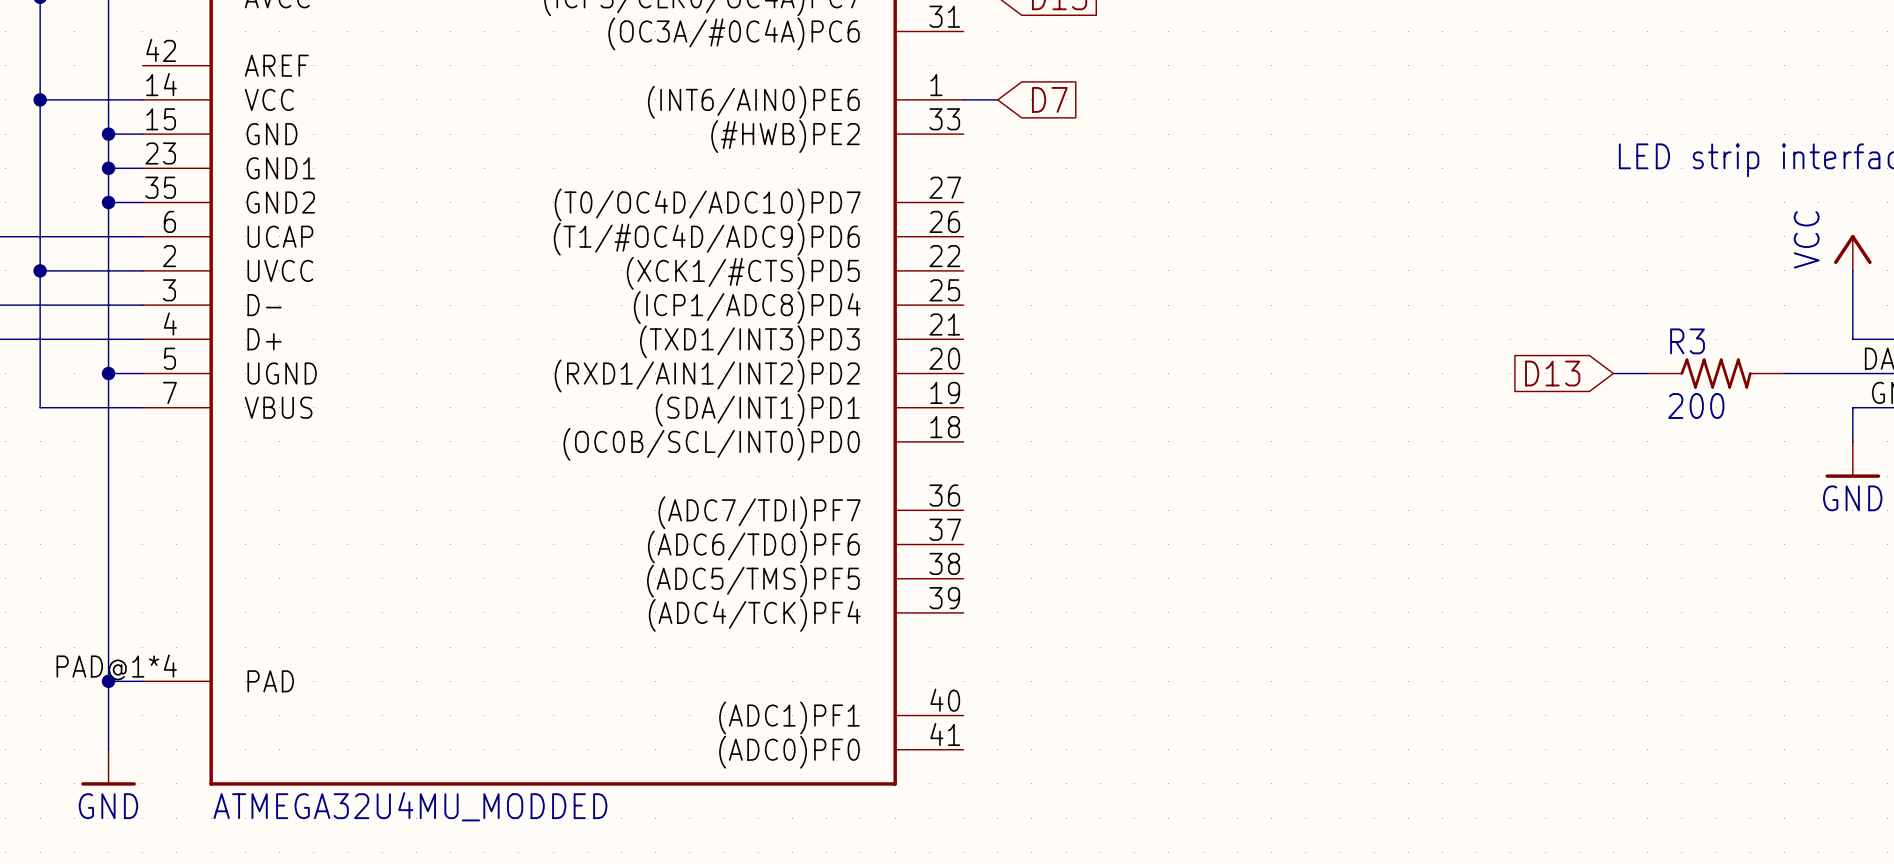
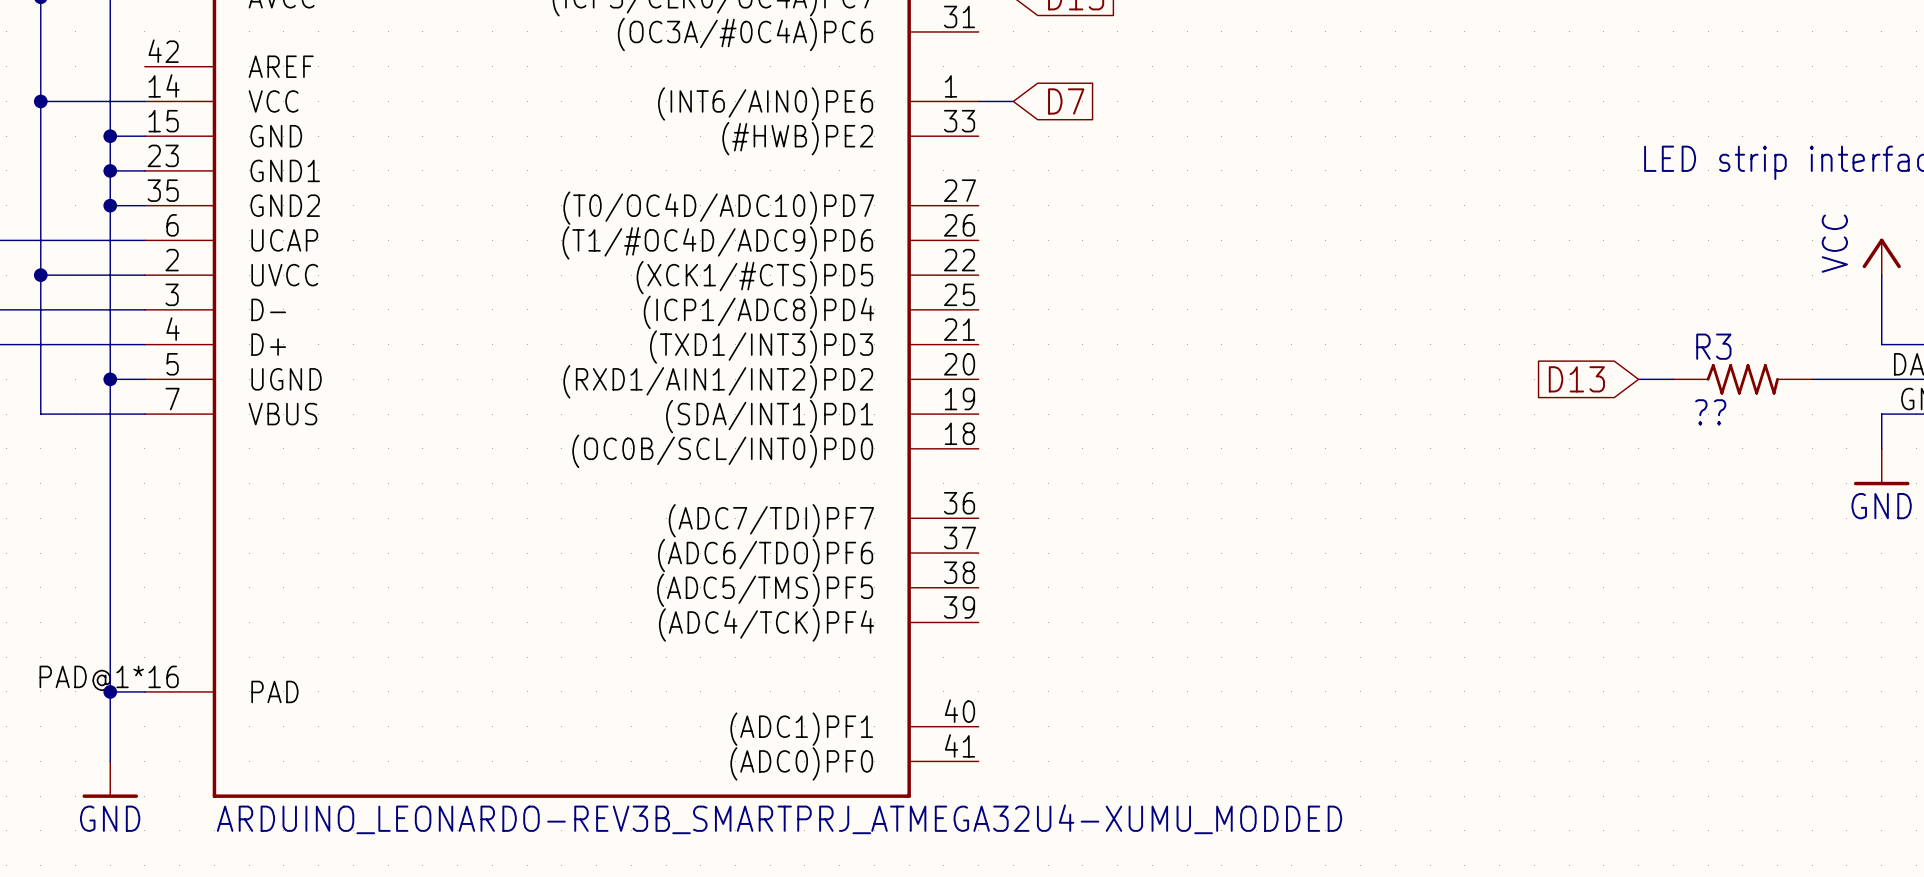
R3 value: 200 (1696, 406) -> ?? (1710, 412)
part pin number: PAD@1*4 (116, 667) -> PAD@1*16 (109, 678)
part value: ATMEGA32U4MU_MODDED (410, 806) -> ARDUINO_LEONARDO-REV3B_SMARTPRJ_ATMEGA32U4-XUMU_MODDED (779, 819)

